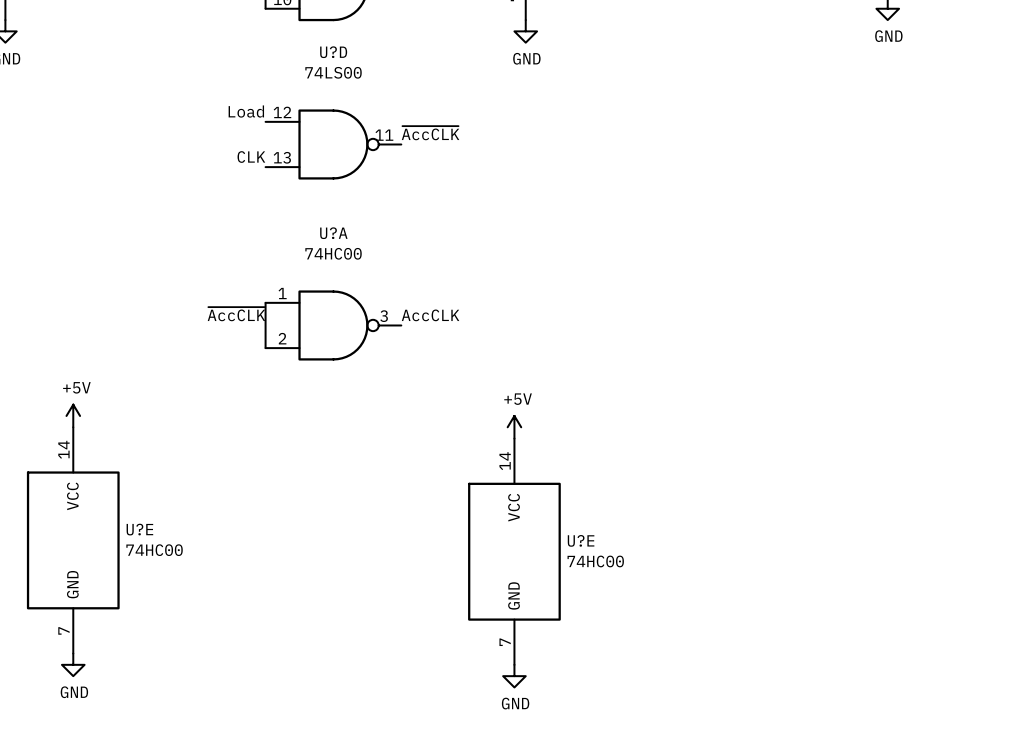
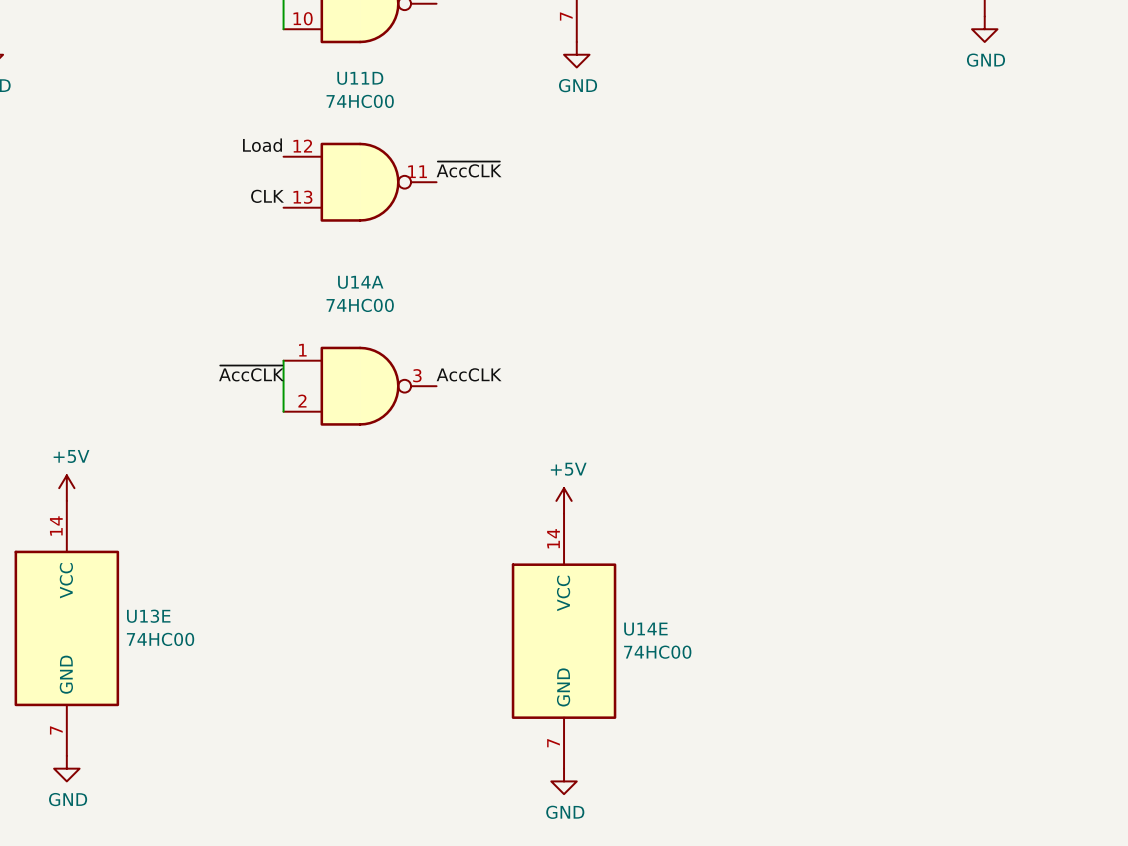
U?D name: U?D (333, 52) -> U11D (360, 78)
U?D value: 74LS00 (333, 72) -> 74HC00 (360, 101)
U?A name: U?A (333, 233) -> U14A (360, 282)
U?E name: U?E (139, 529) -> U13E (148, 616)
U?E name: U?E (581, 540) -> U14E (645, 629)

